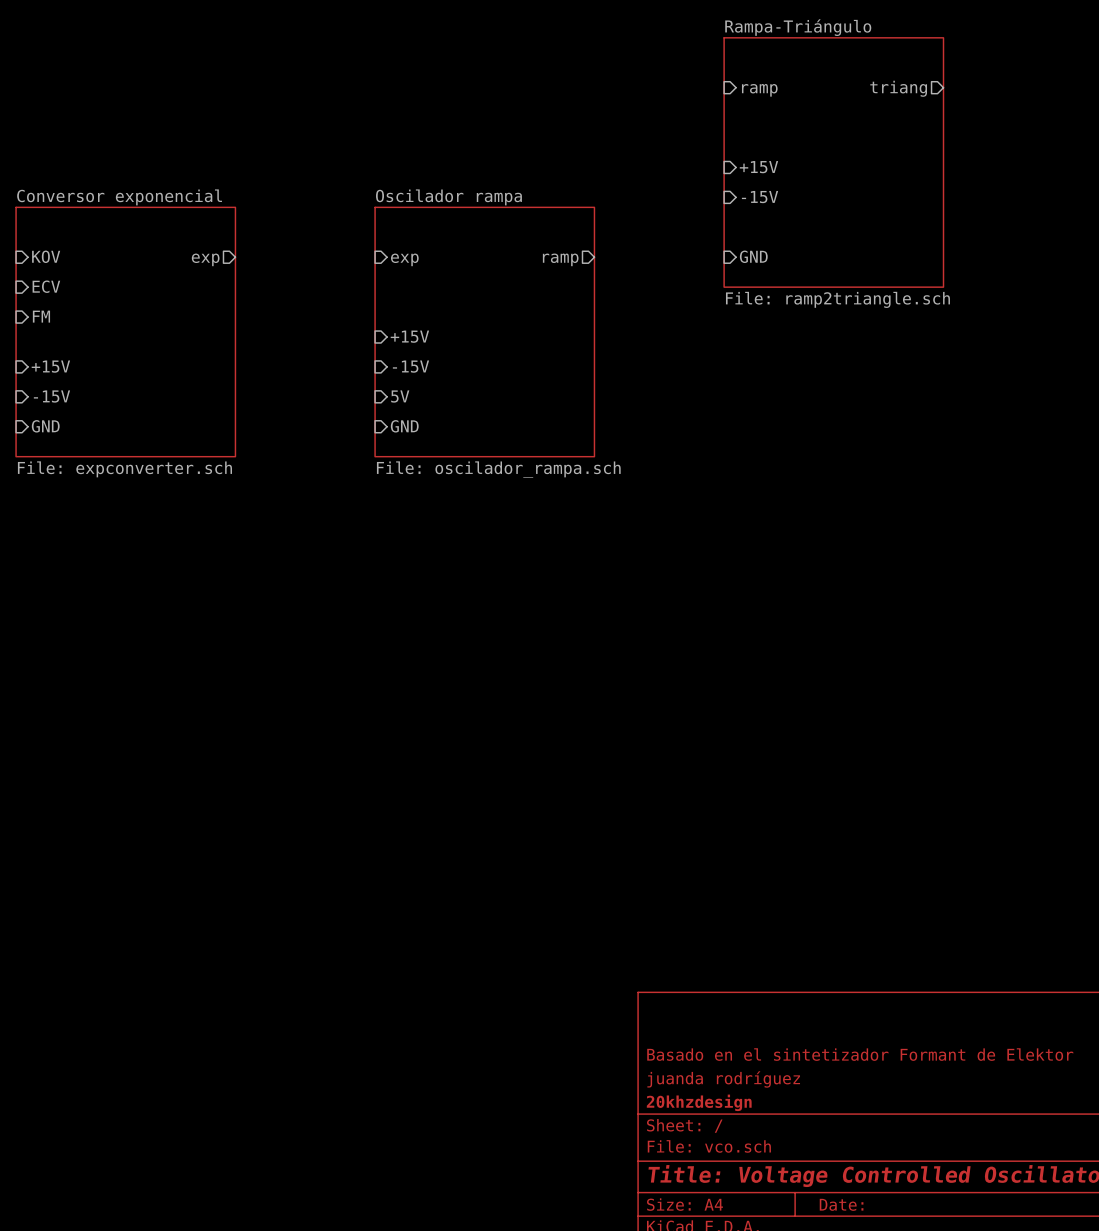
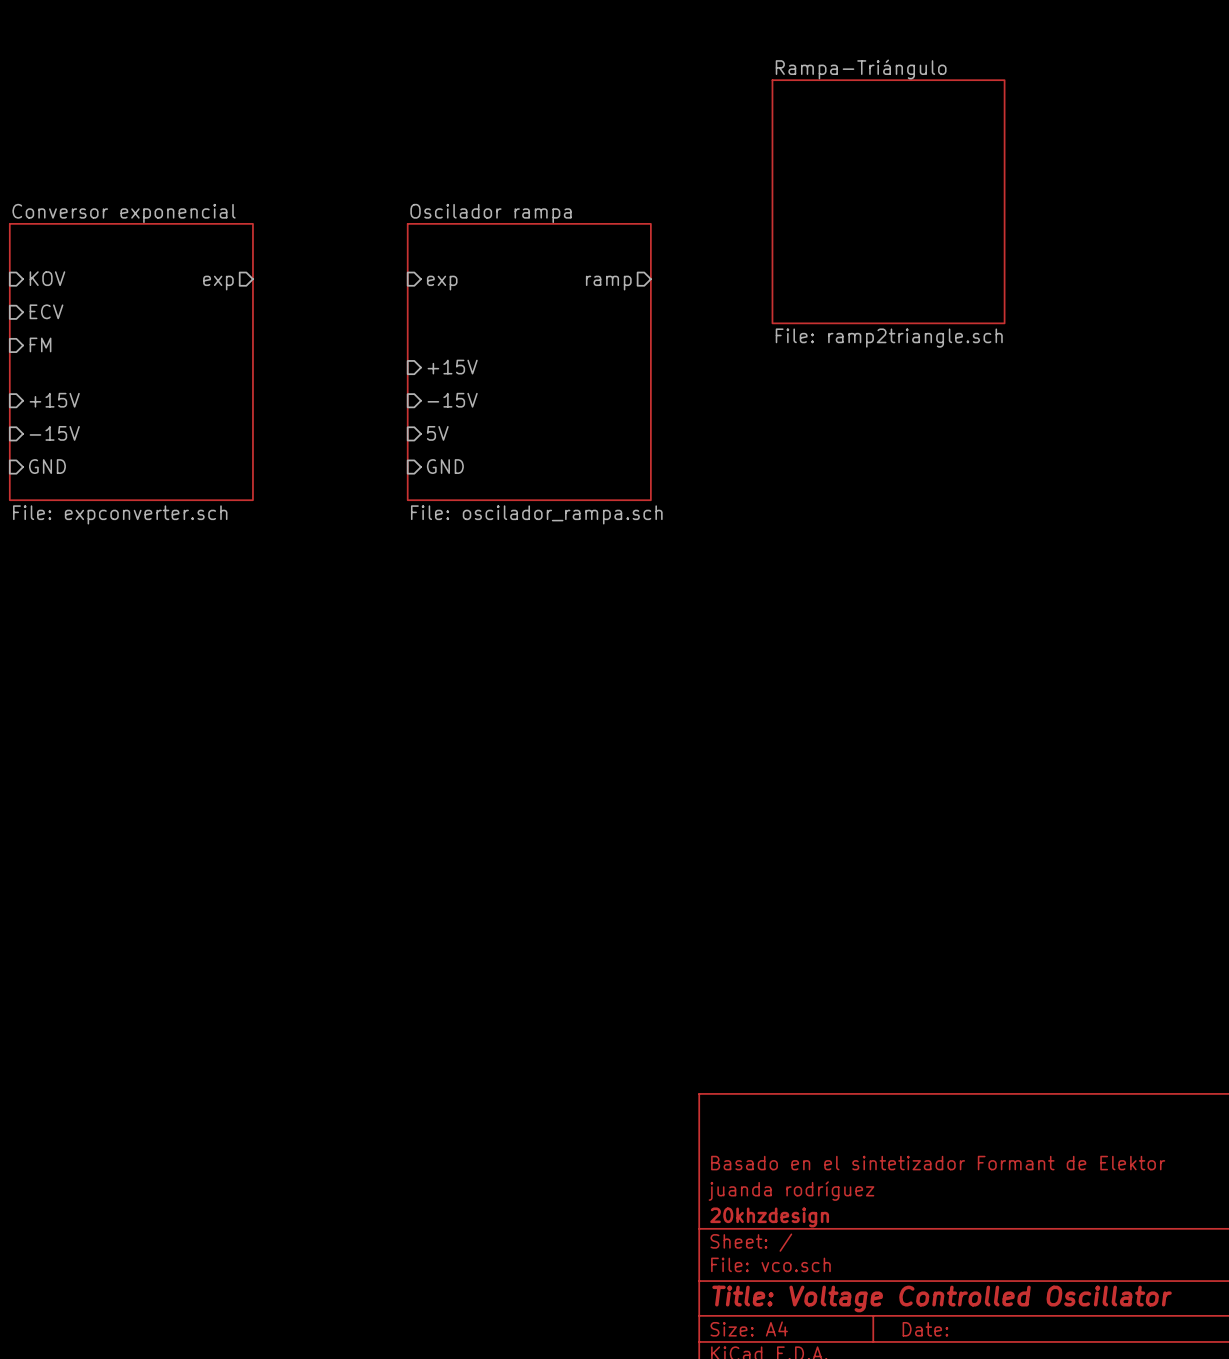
sheet pin: triang (898, 88) -> none
sheet pin: ramp (759, 90) -> none
sheet Rampa-Triángulo: File: ramp2triangle.sch (833, 162) -> none
sheet pin: +15V (758, 167) -> none
sheet Rampa-Triángulo: none -> File: ramp2triangle.sch (888, 201)
sheet pin: -15V (760, 197) -> none
sheet pin: GND (753, 256) -> none

